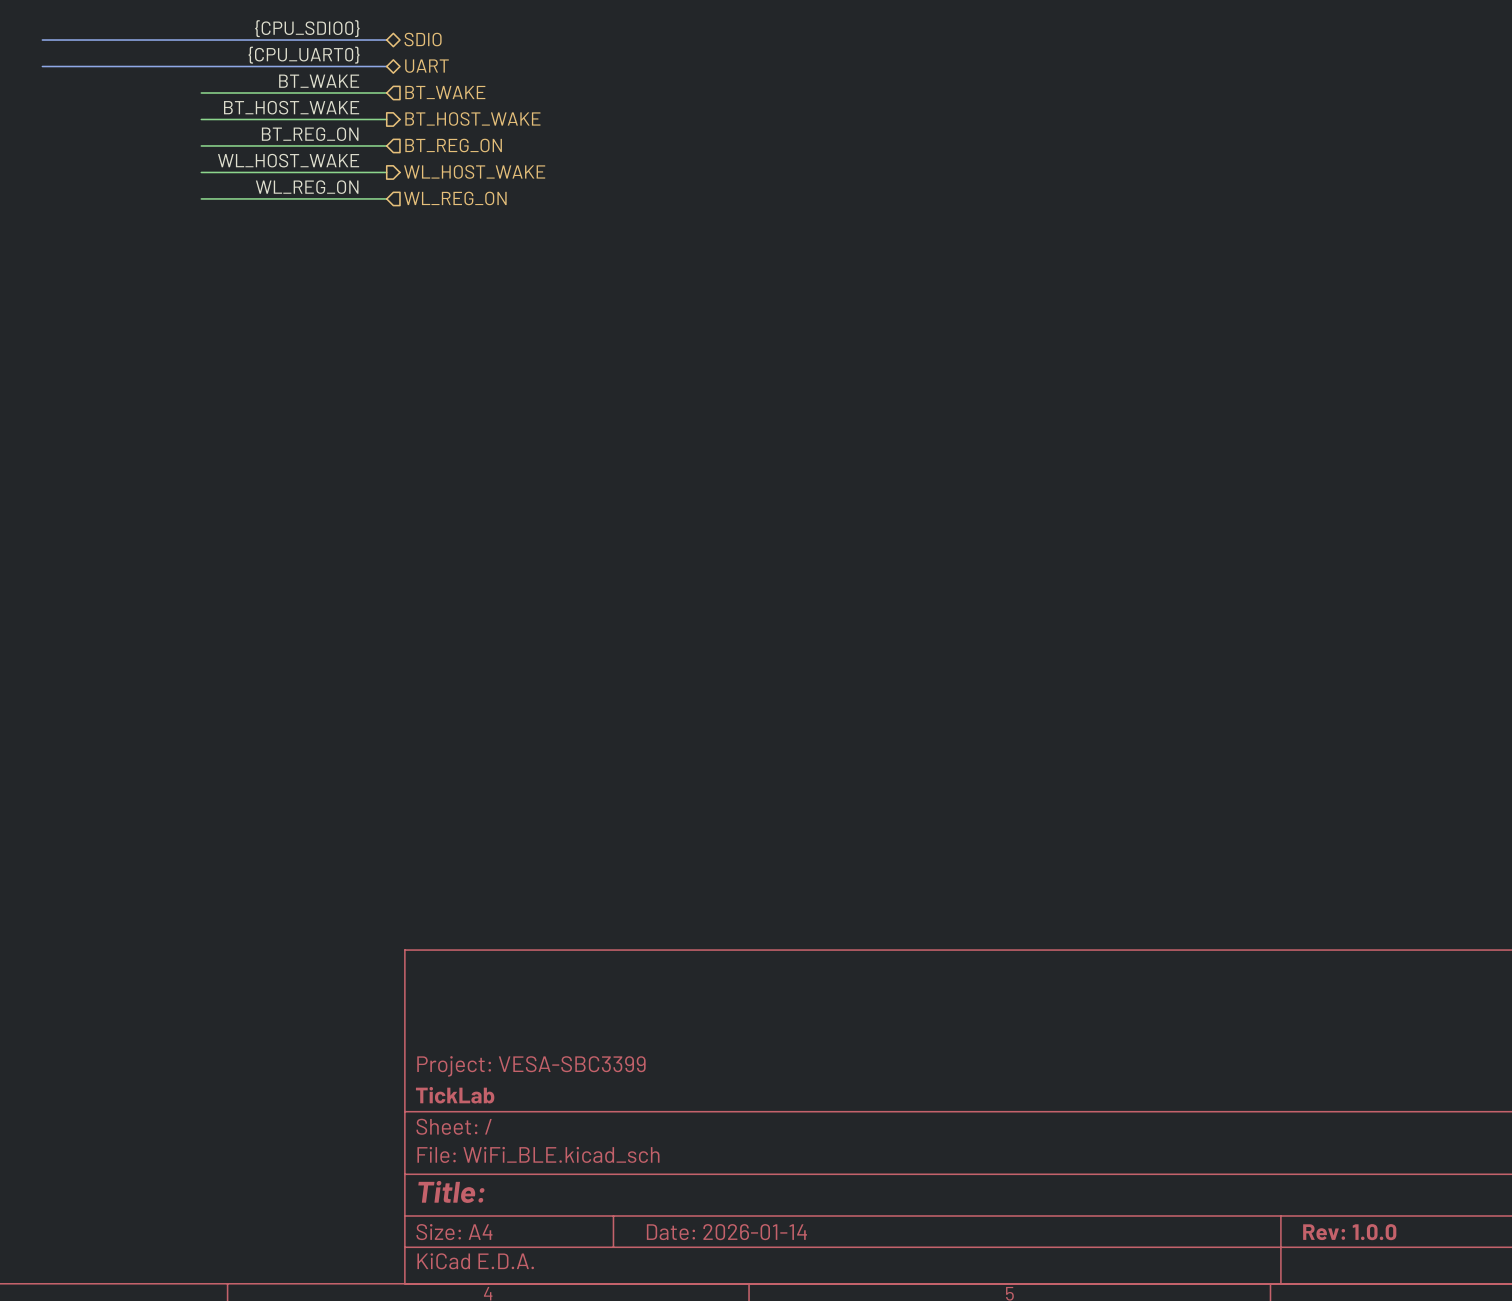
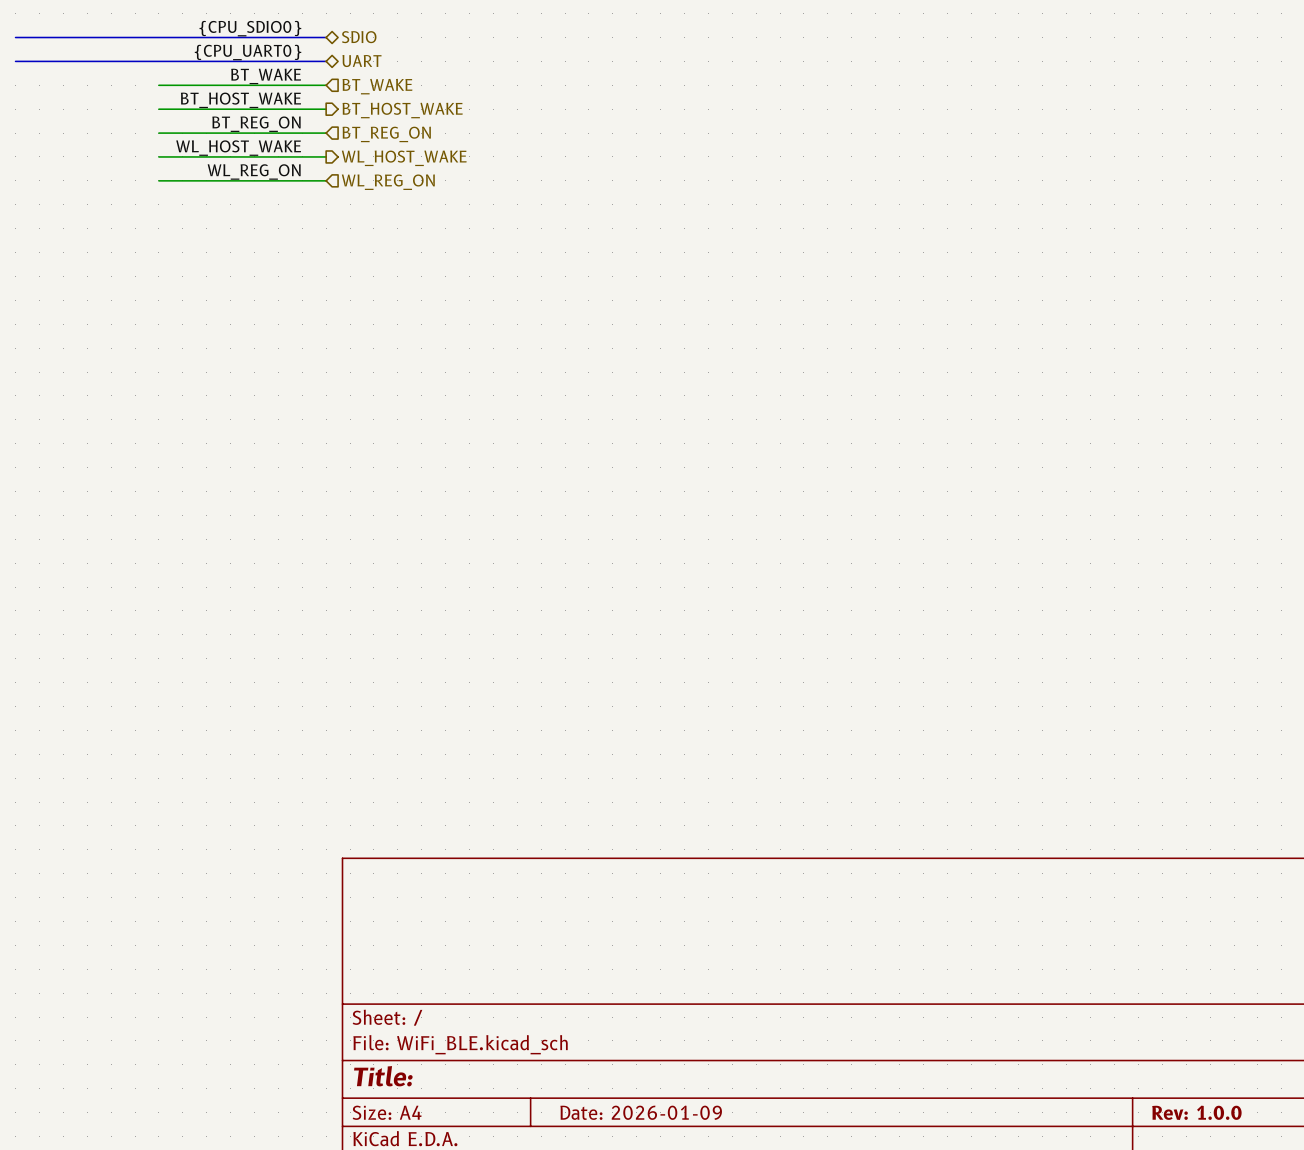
title block: Project: VESA-SBC3399 (531, 1066) -> none
title block: TickLab (455, 1095) -> none
title block: Date: 2026-01-14 (726, 1232) -> Date: 2026-01-09 (641, 1112)

